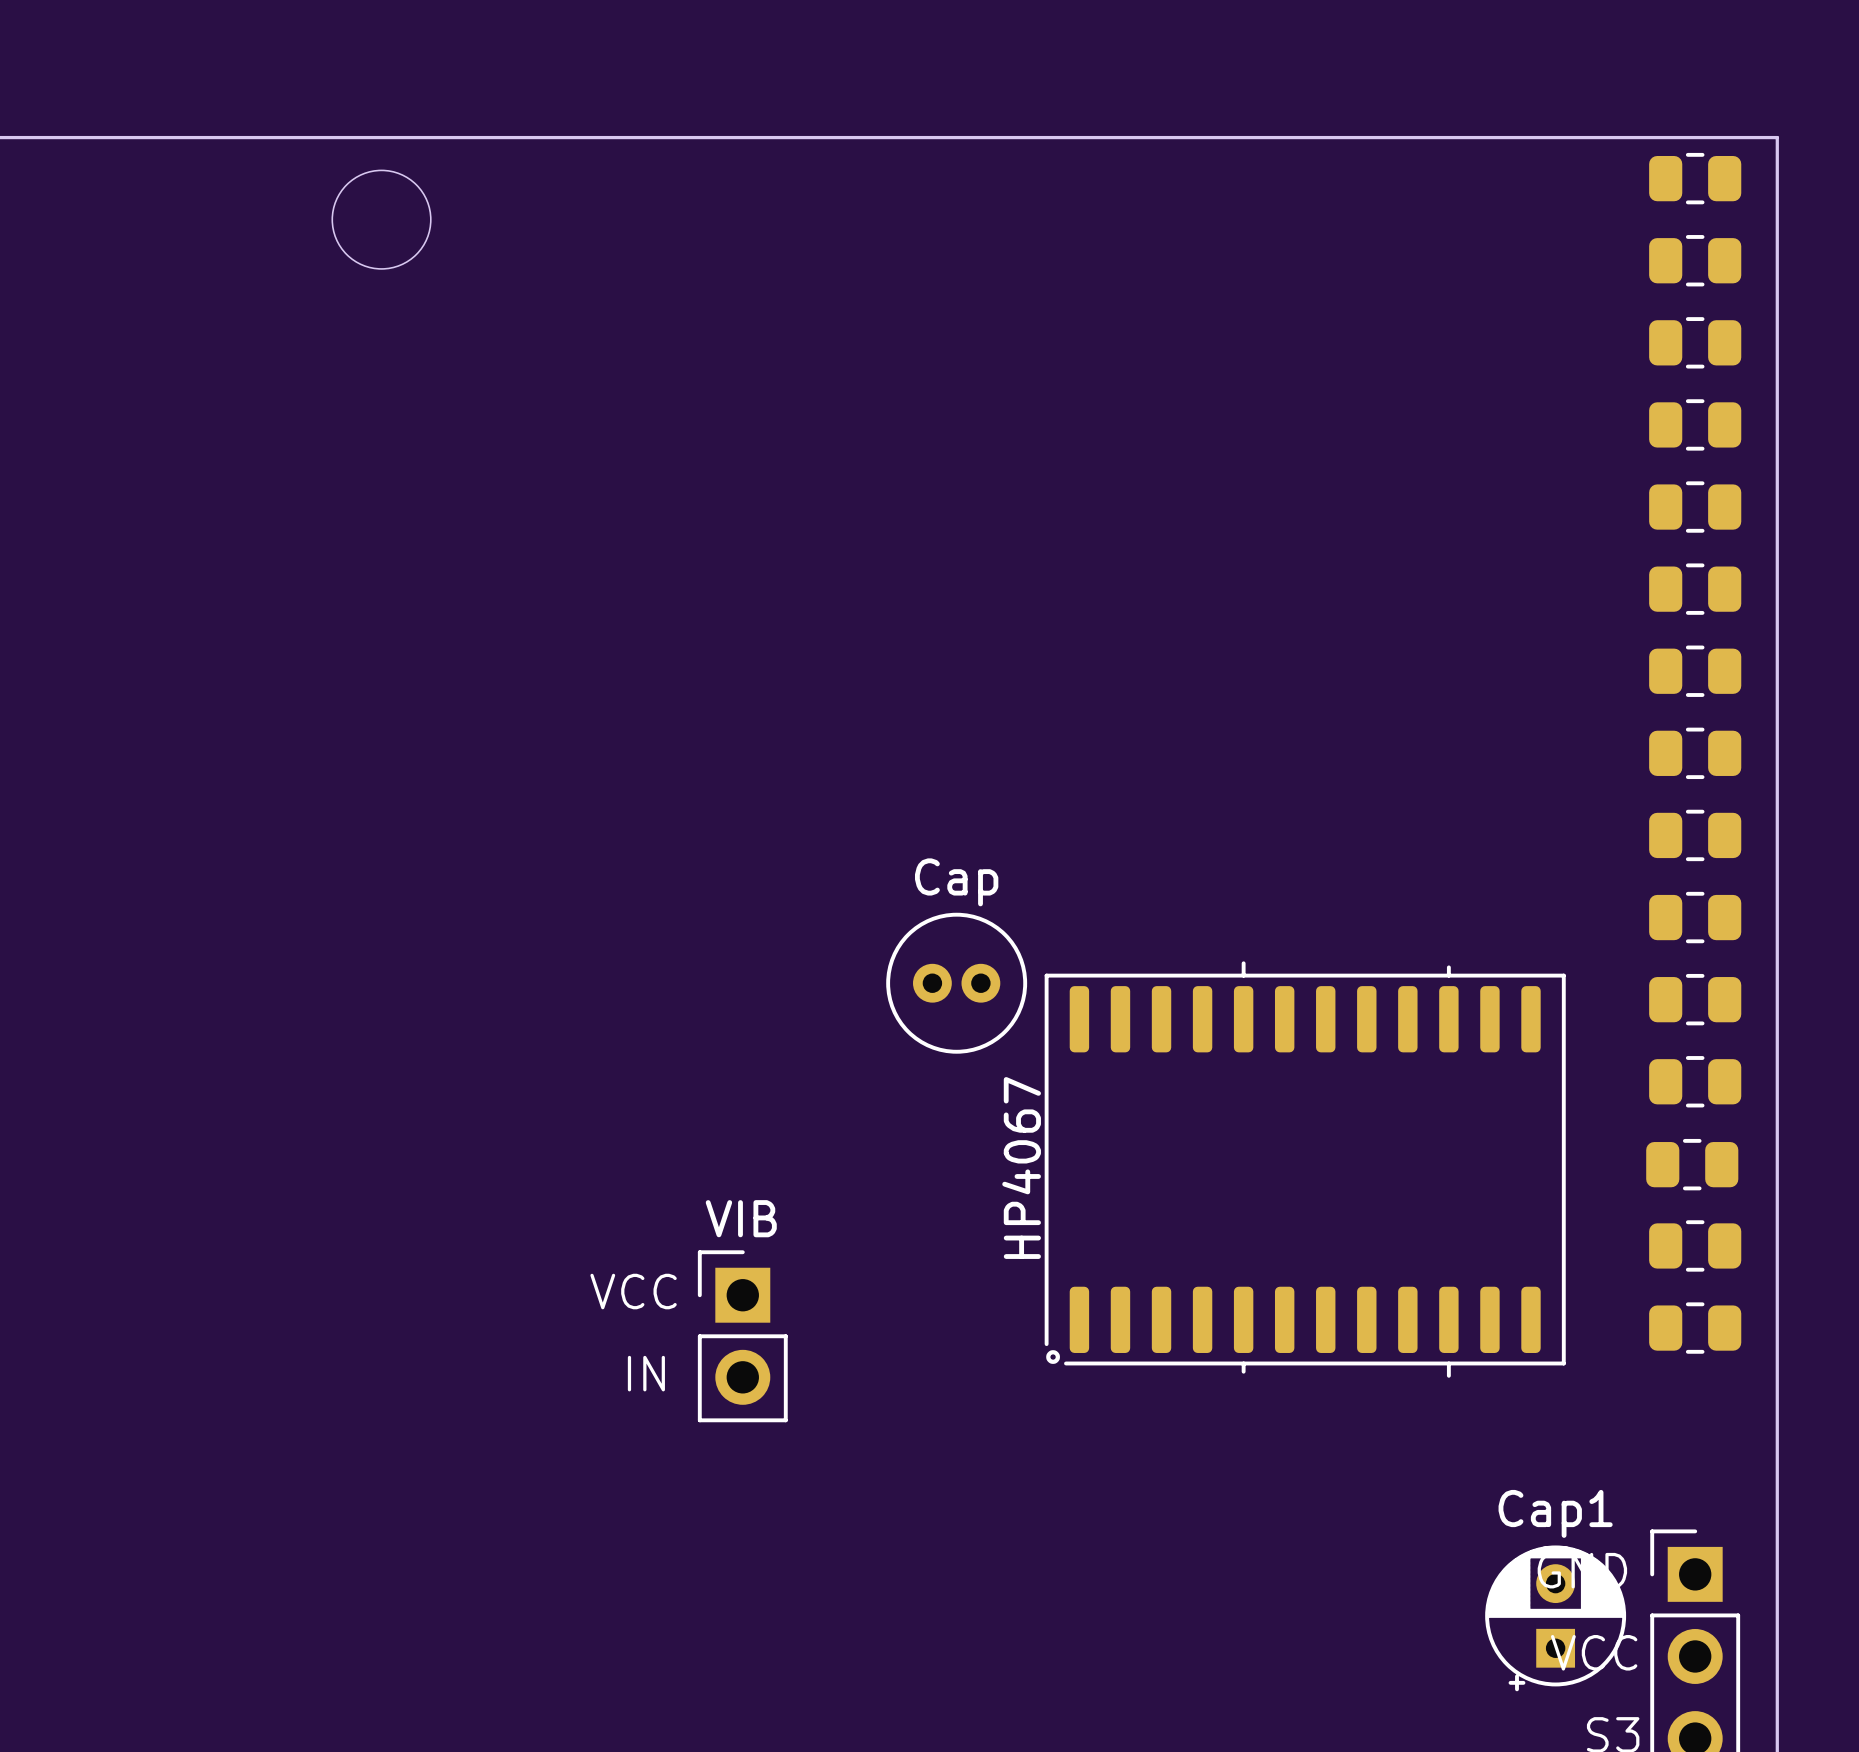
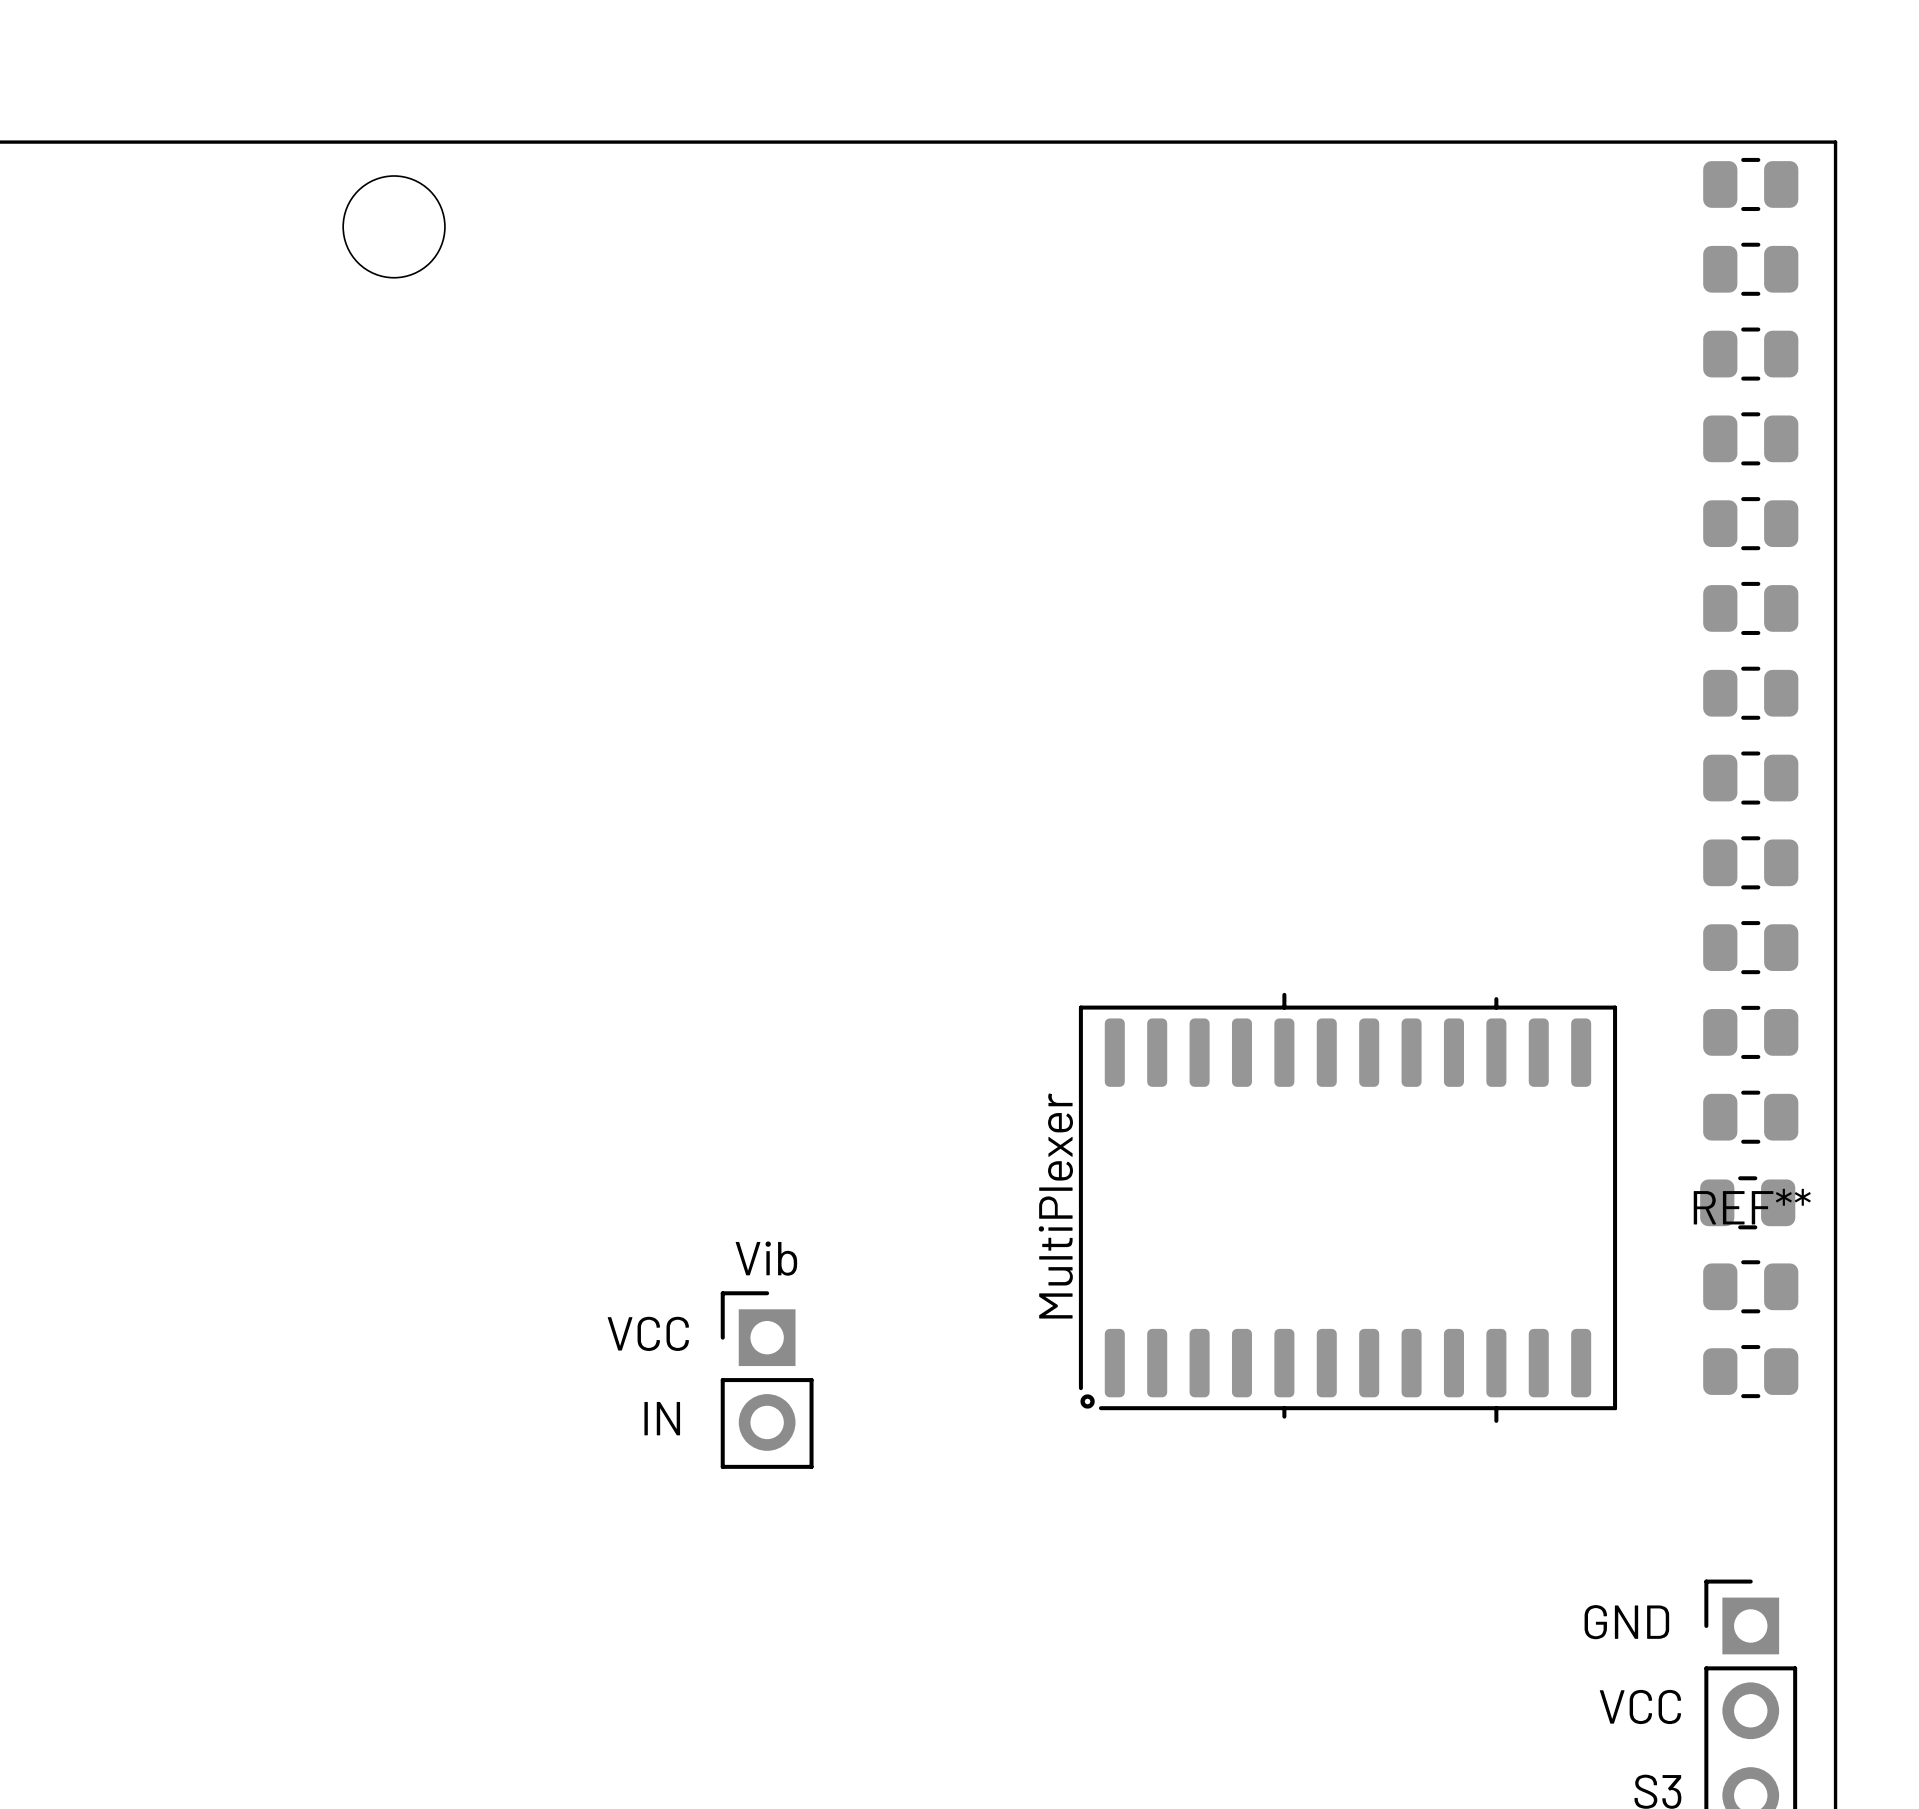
Cap: (956, 983) -> none
HP4067 name: HP4067 (1021, 1168) -> MultiPlexer (1055, 1205)
REF** name: none -> REF** (1752, 1206)
VIB name: VIB (741, 1218) -> Vib (766, 1258)
Cap1: (1555, 1618) -> none

